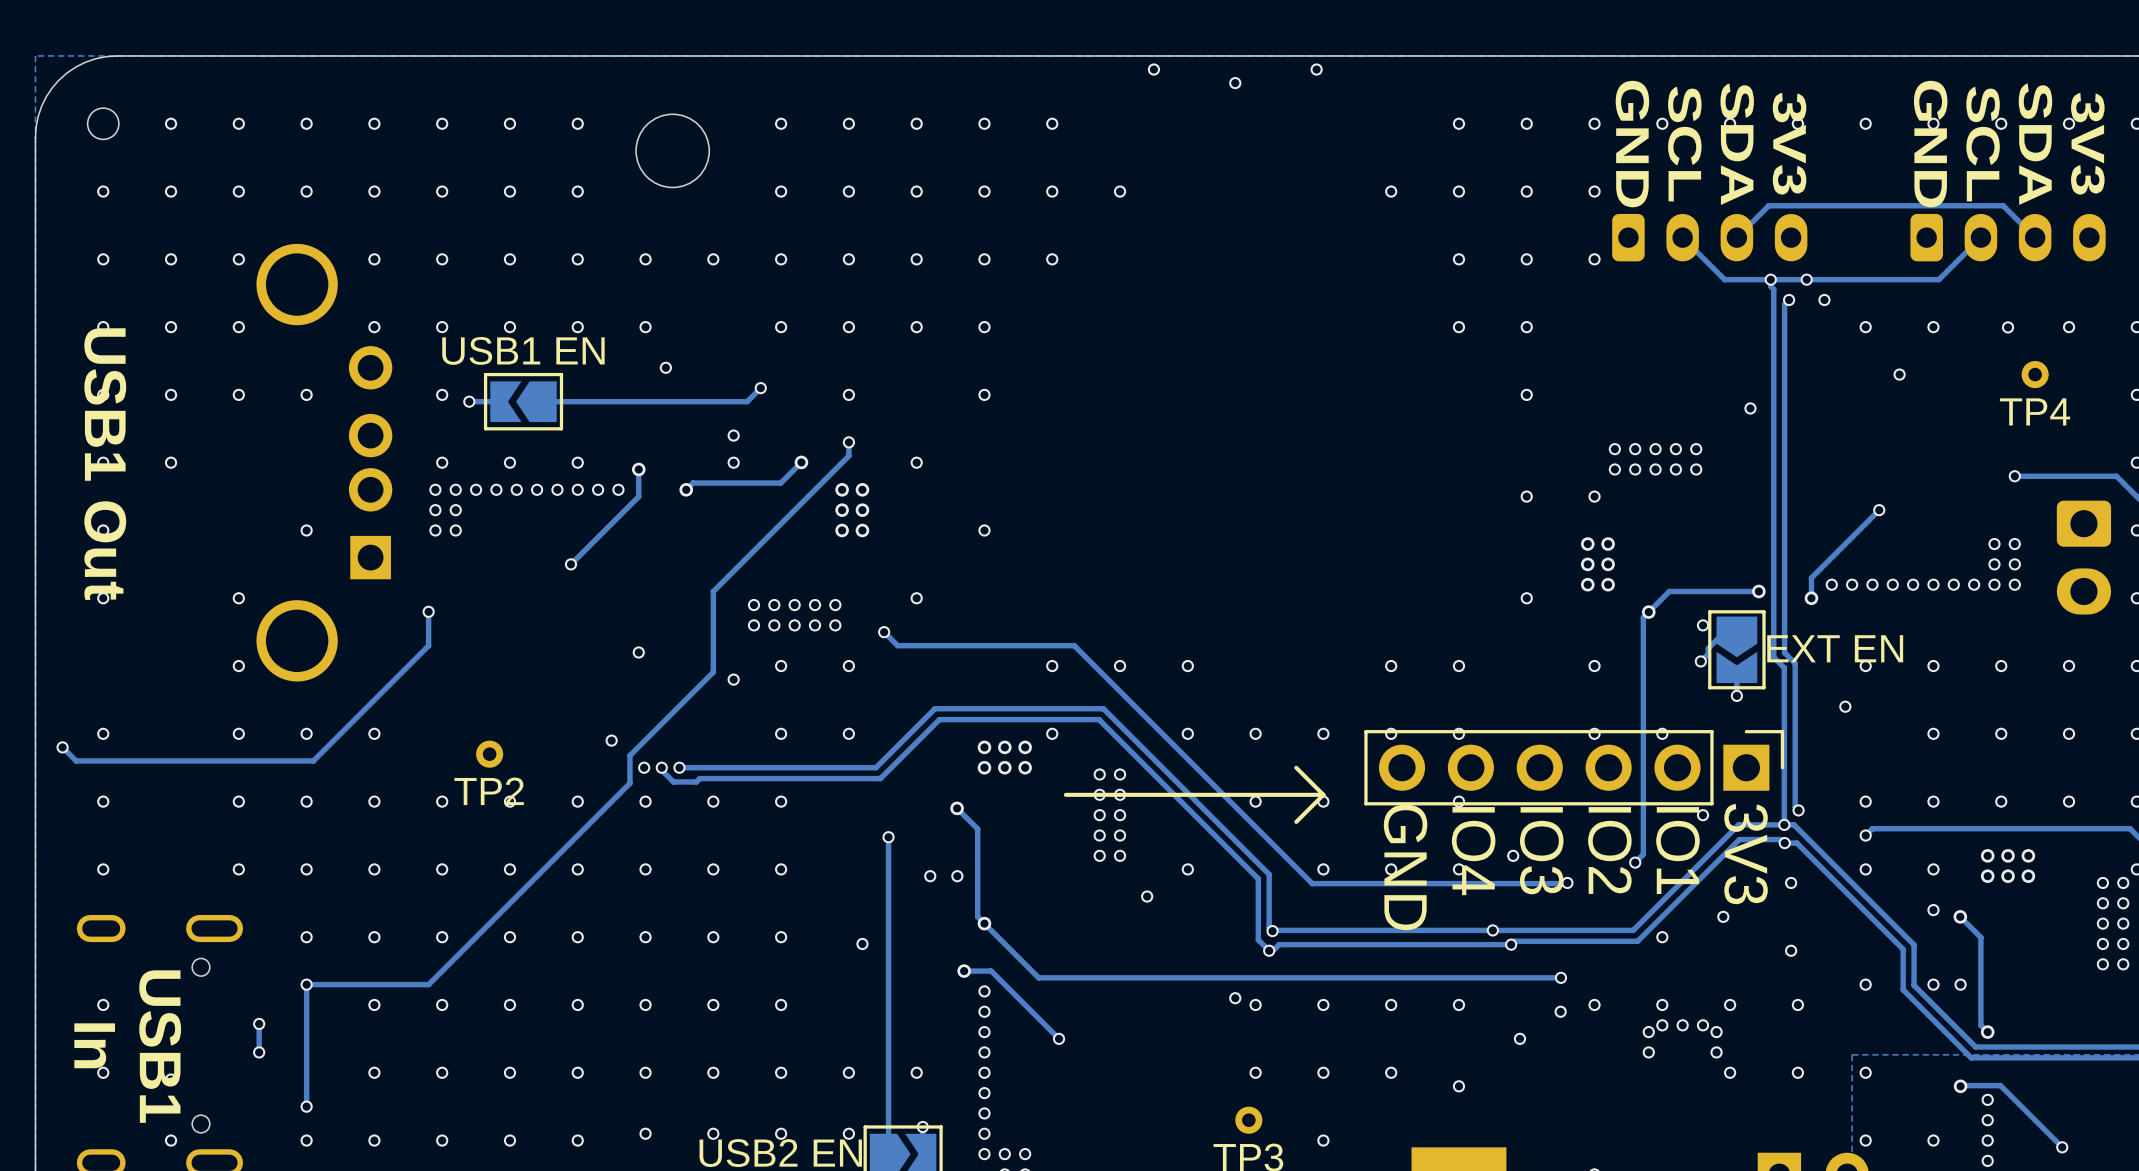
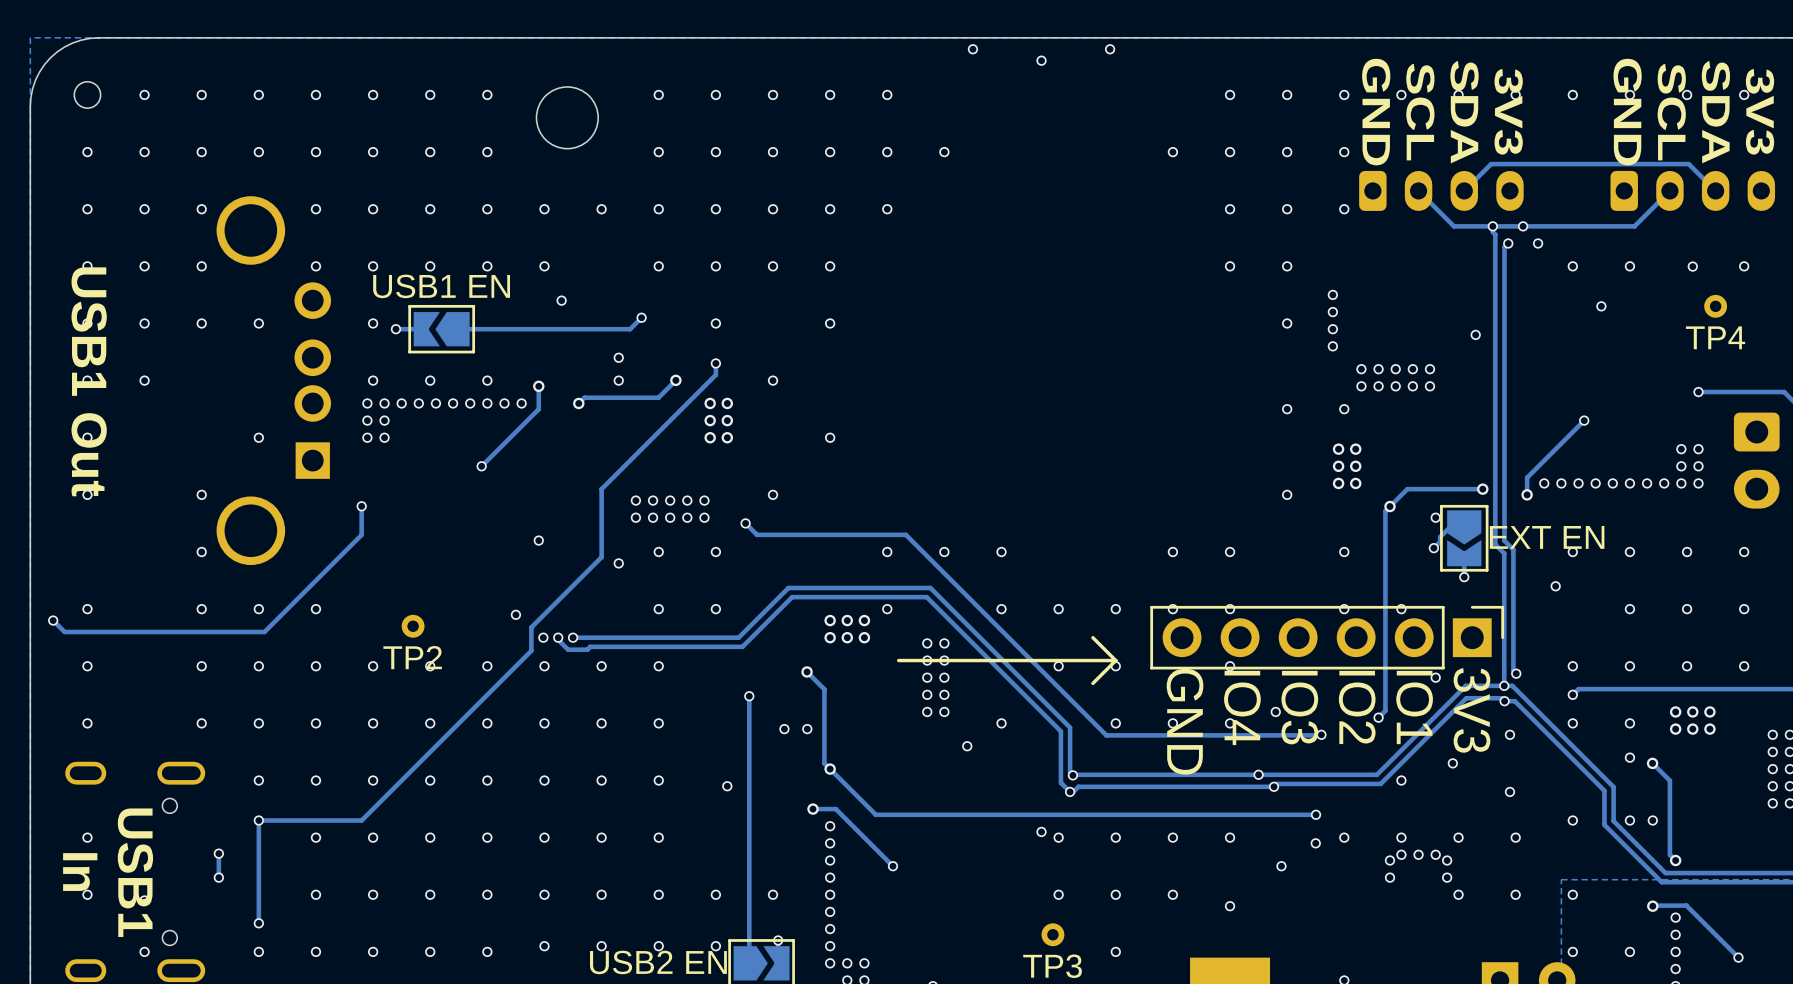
via: none -> (1332, 294)
via: none -> (1332, 312)
via: none -> (1332, 329)
via: none -> (1332, 346)

